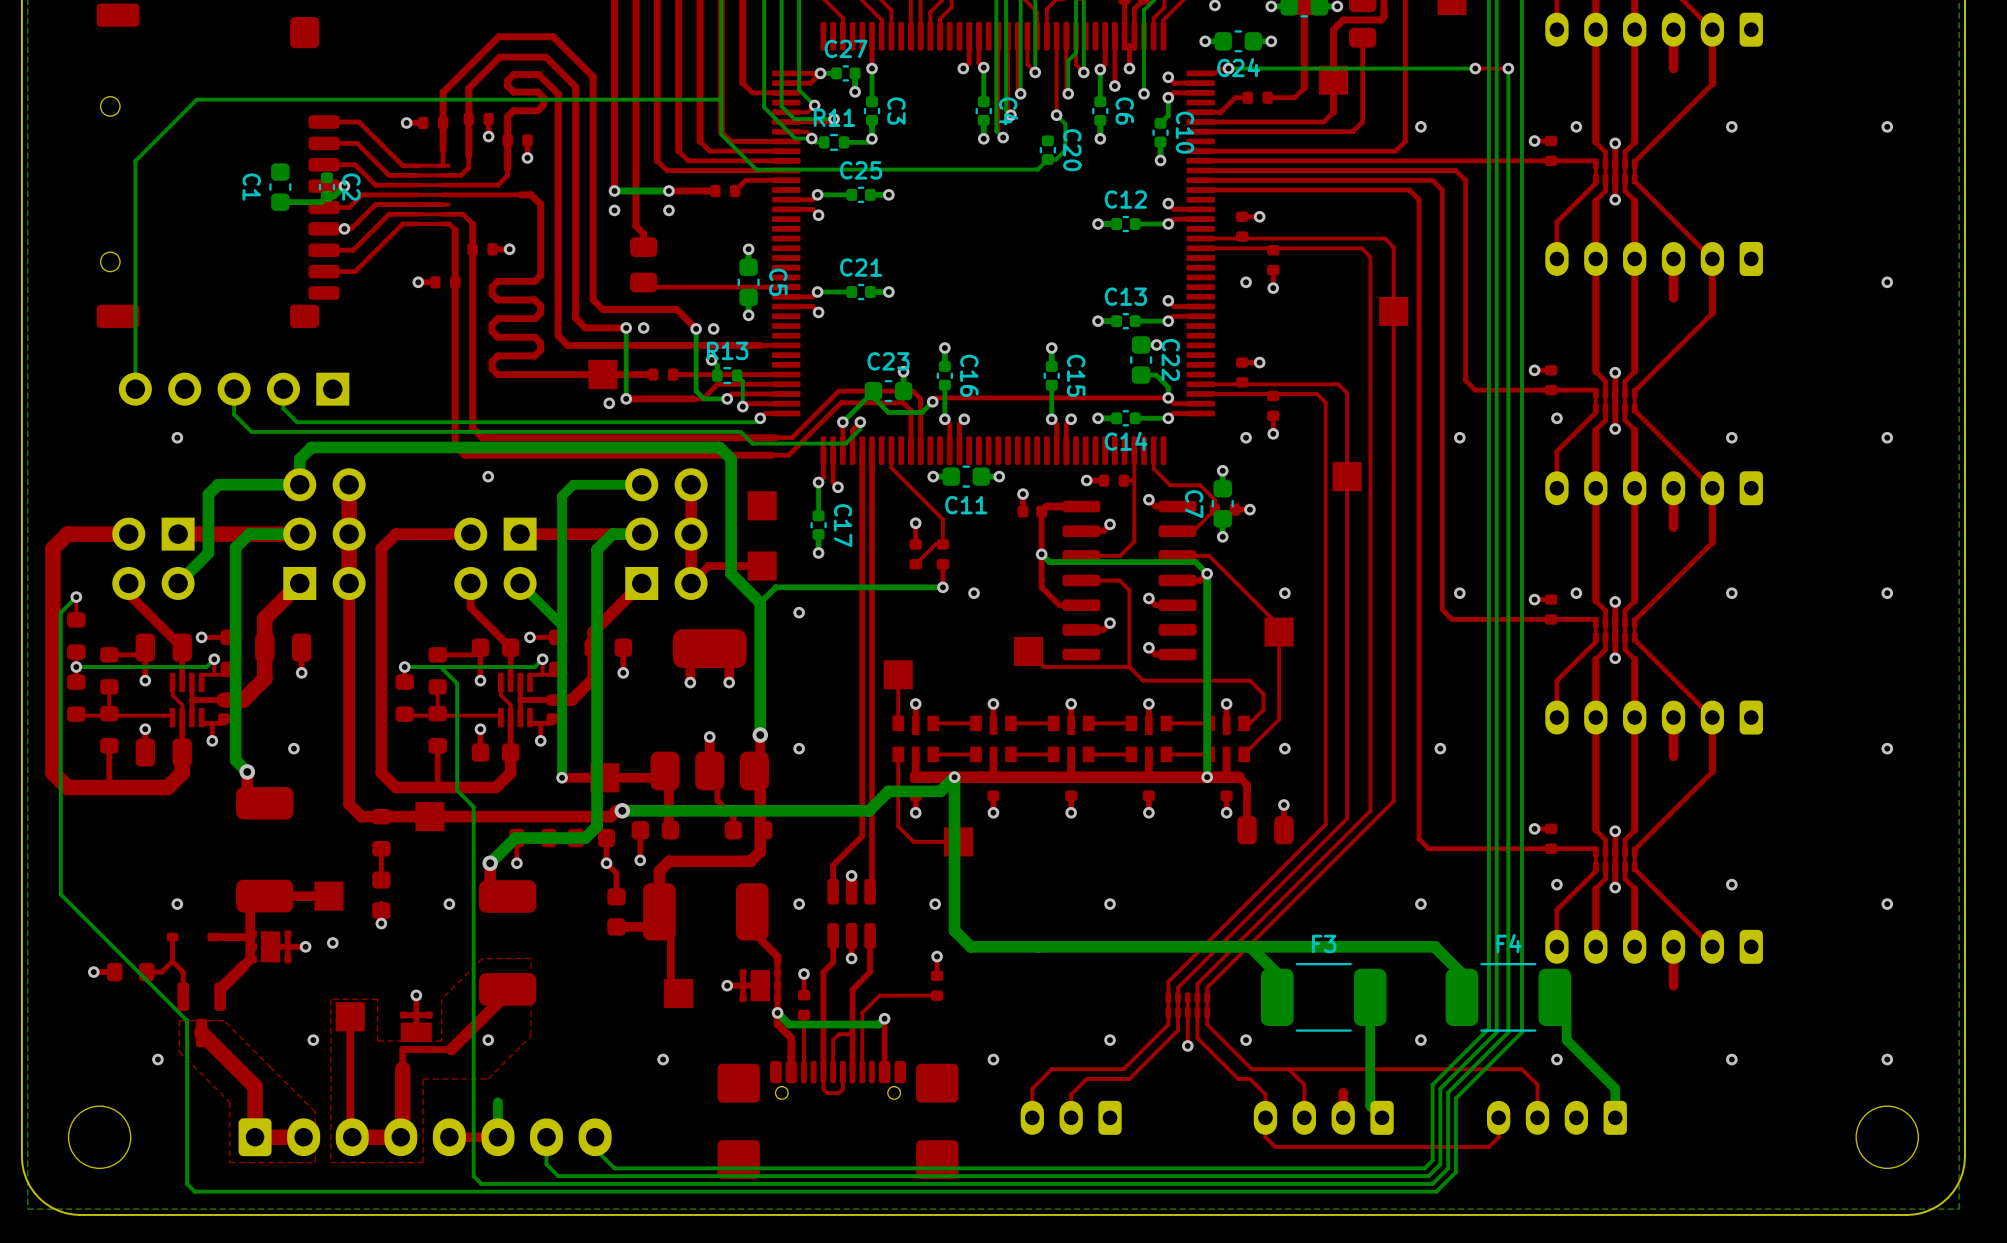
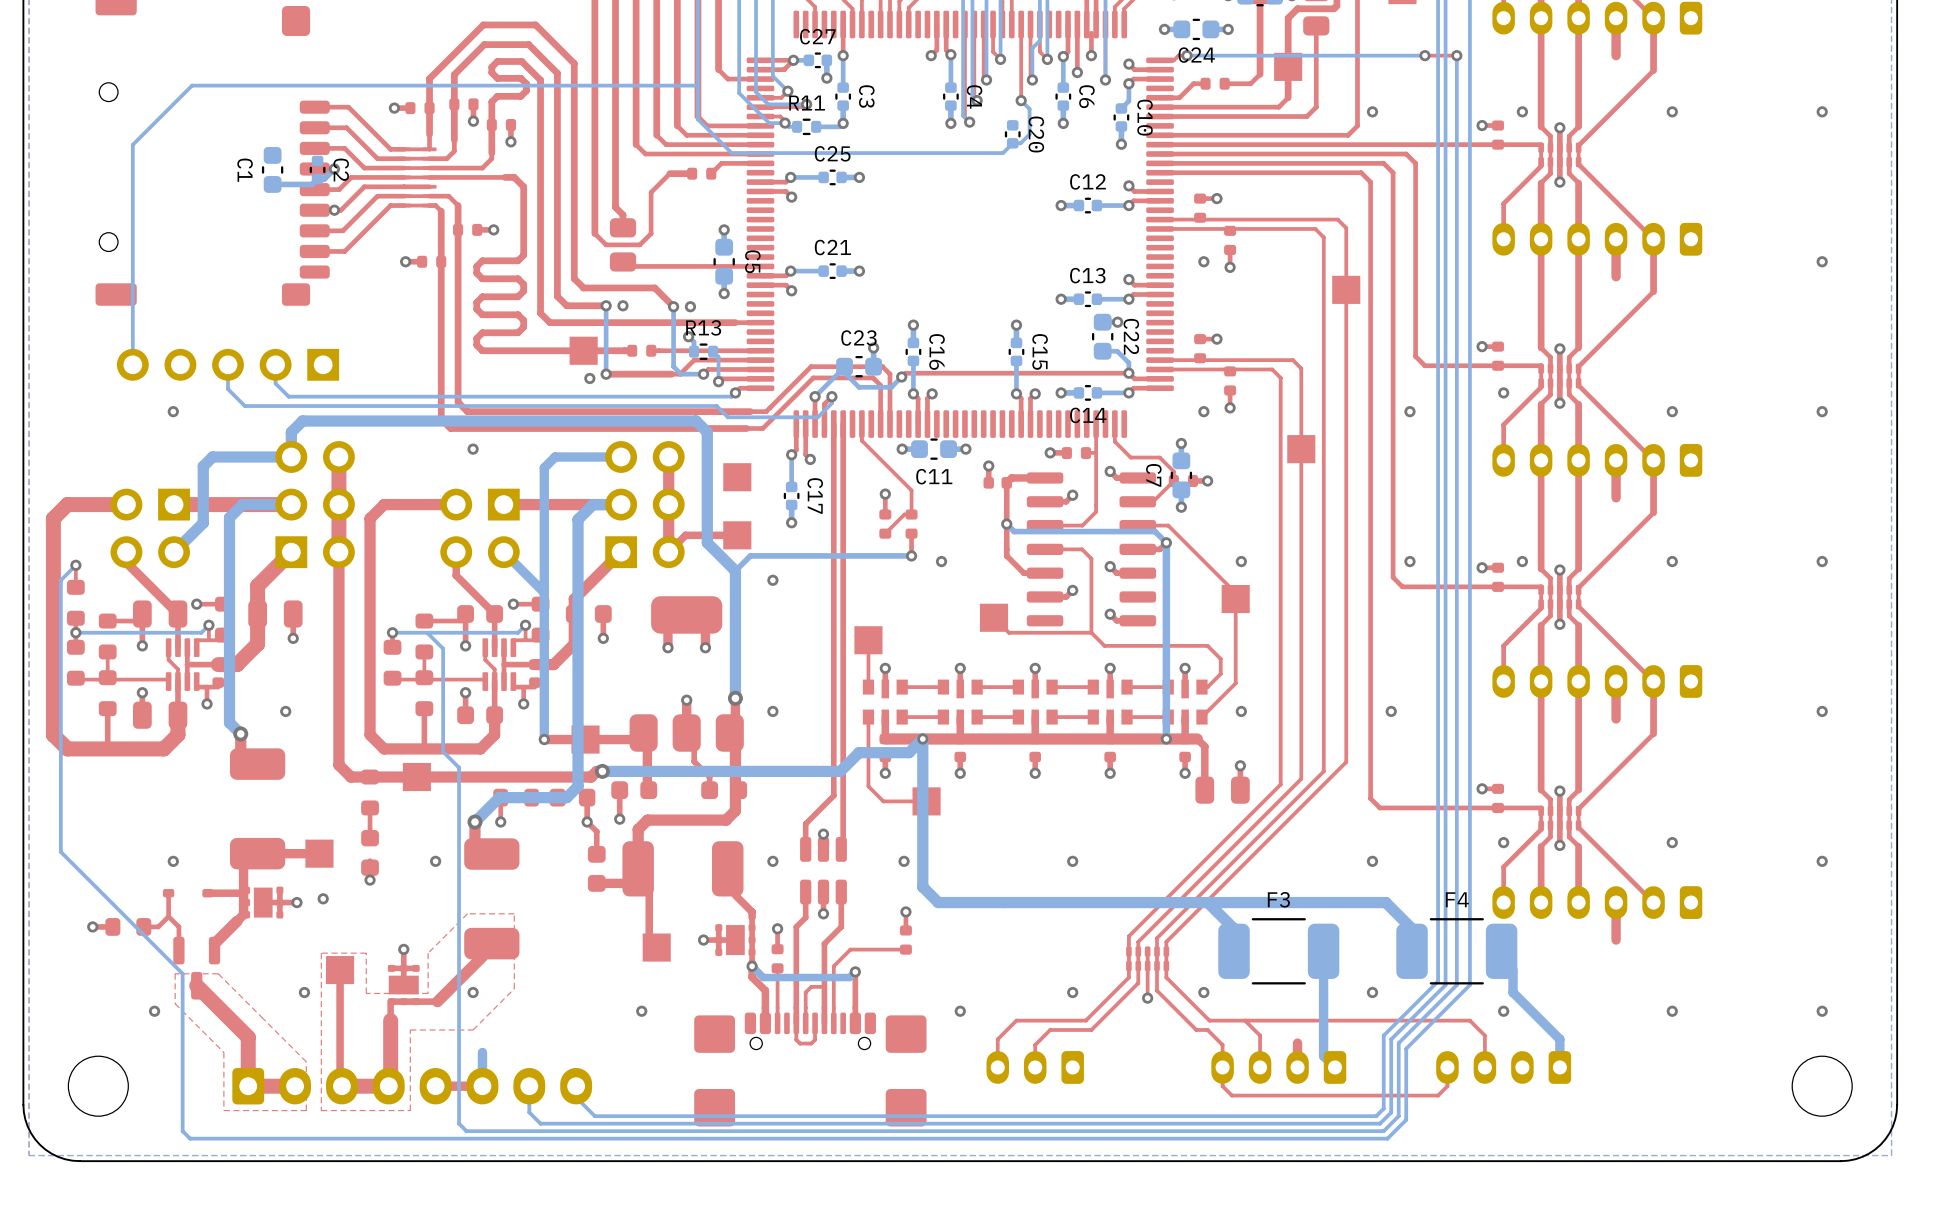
via: (614, 190) -> none
bottom track: (668, 190) (614, 190) -> none
via: (668, 190) -> none
top track: (692, 190) (668, 190) -> (669, 173) (651, 192) (651, 233) (639, 244) (606, 244) (594, 233) (594, 173)
via: (614, 210) -> none
via: (668, 210) -> none

